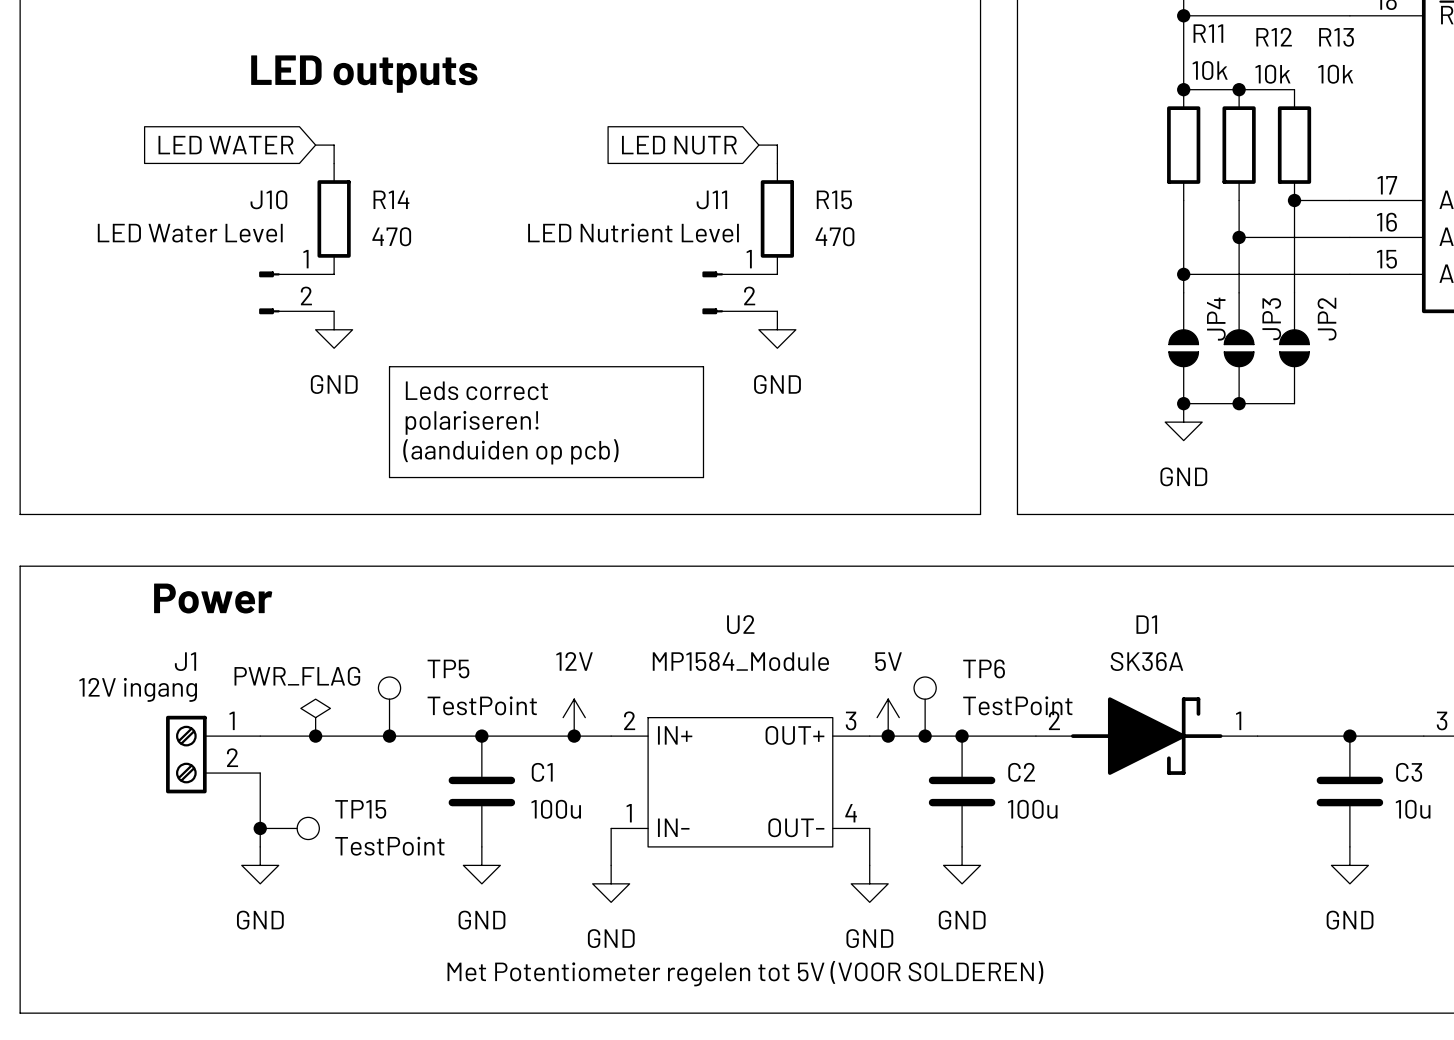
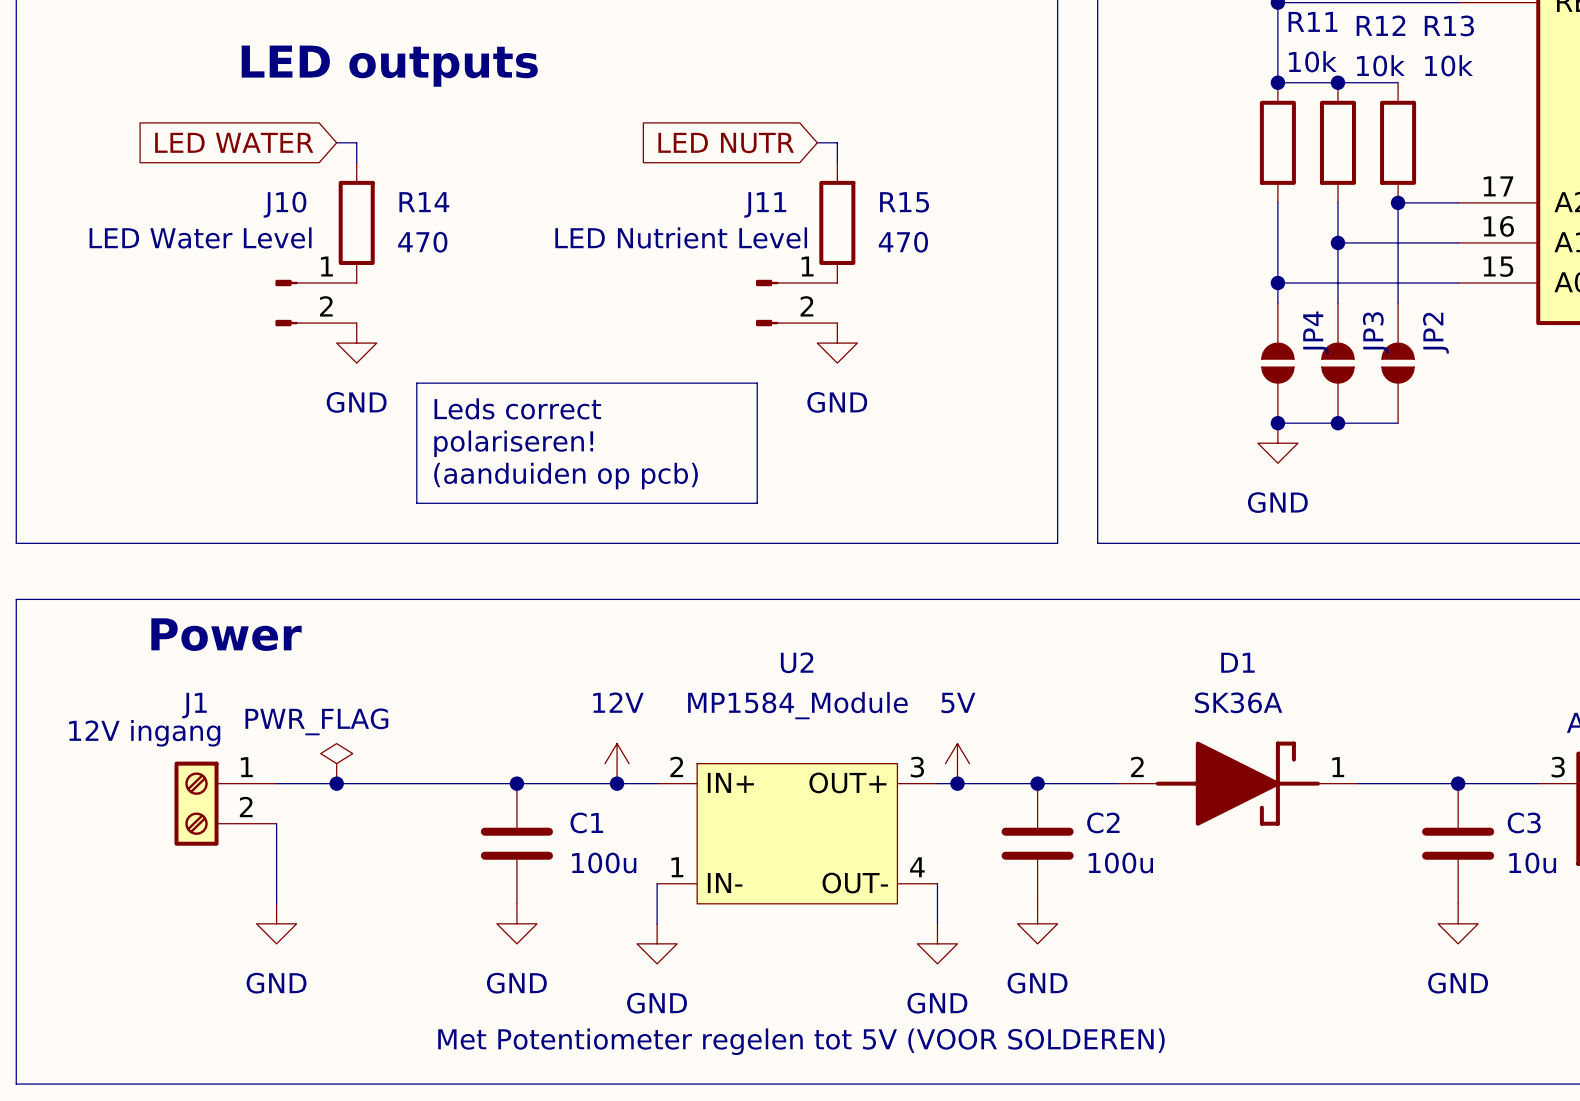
TP5: TestPoint (389, 706) -> none
TP6: TestPoint (925, 706) -> none
junction: (389, 736) -> none
junction: (925, 736) -> none
junction: (260, 828) -> none
TP15: TestPoint (289, 828) -> none

